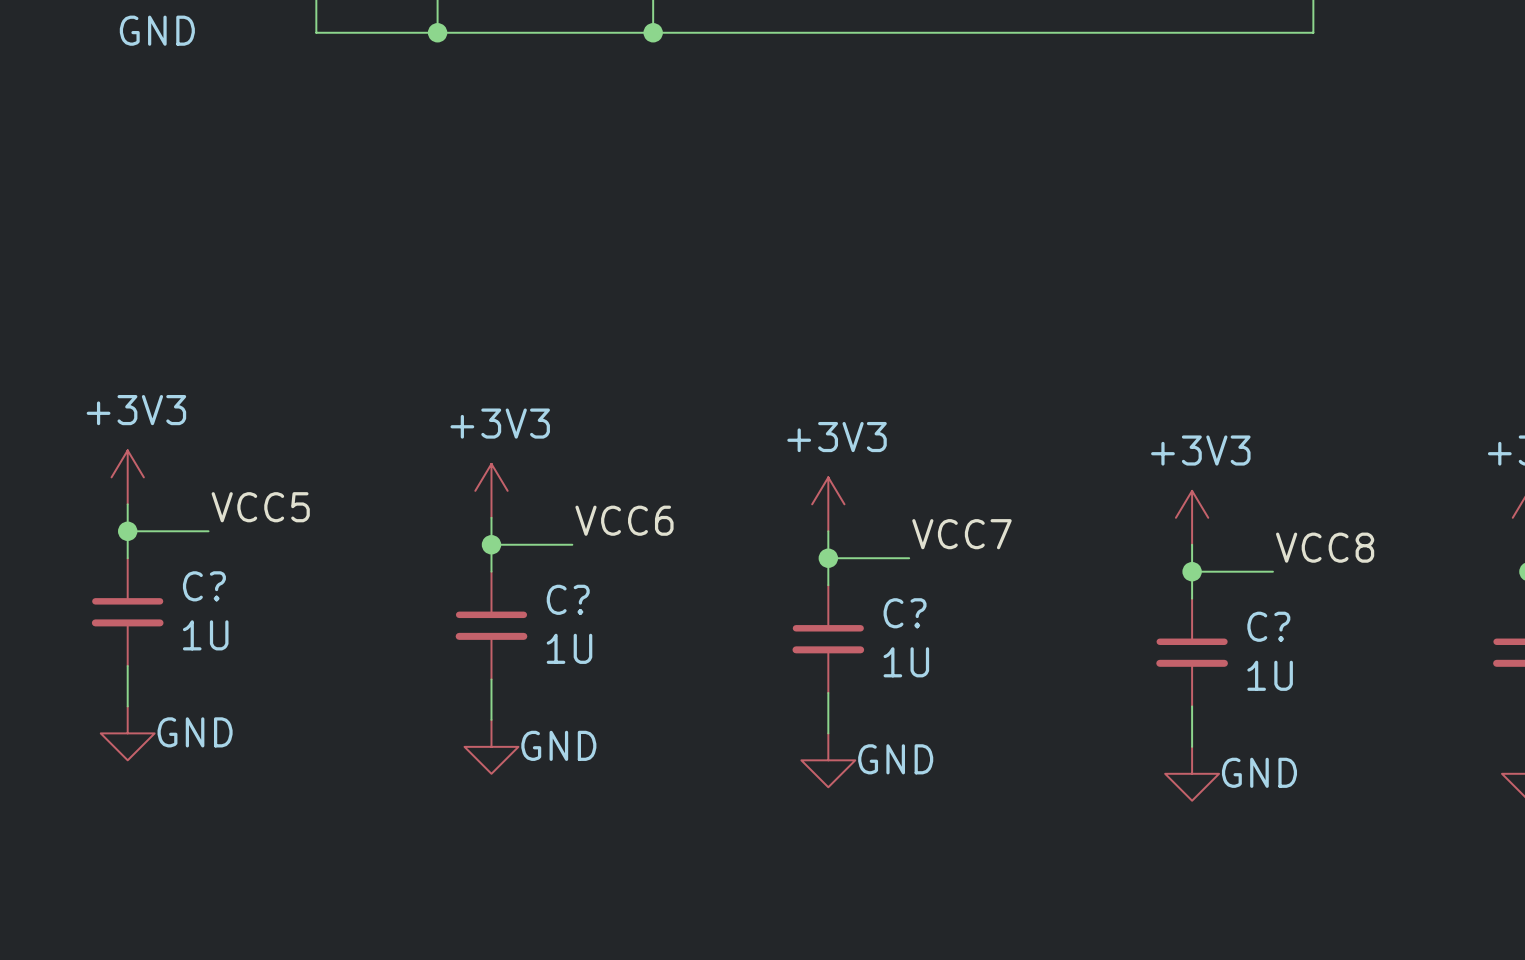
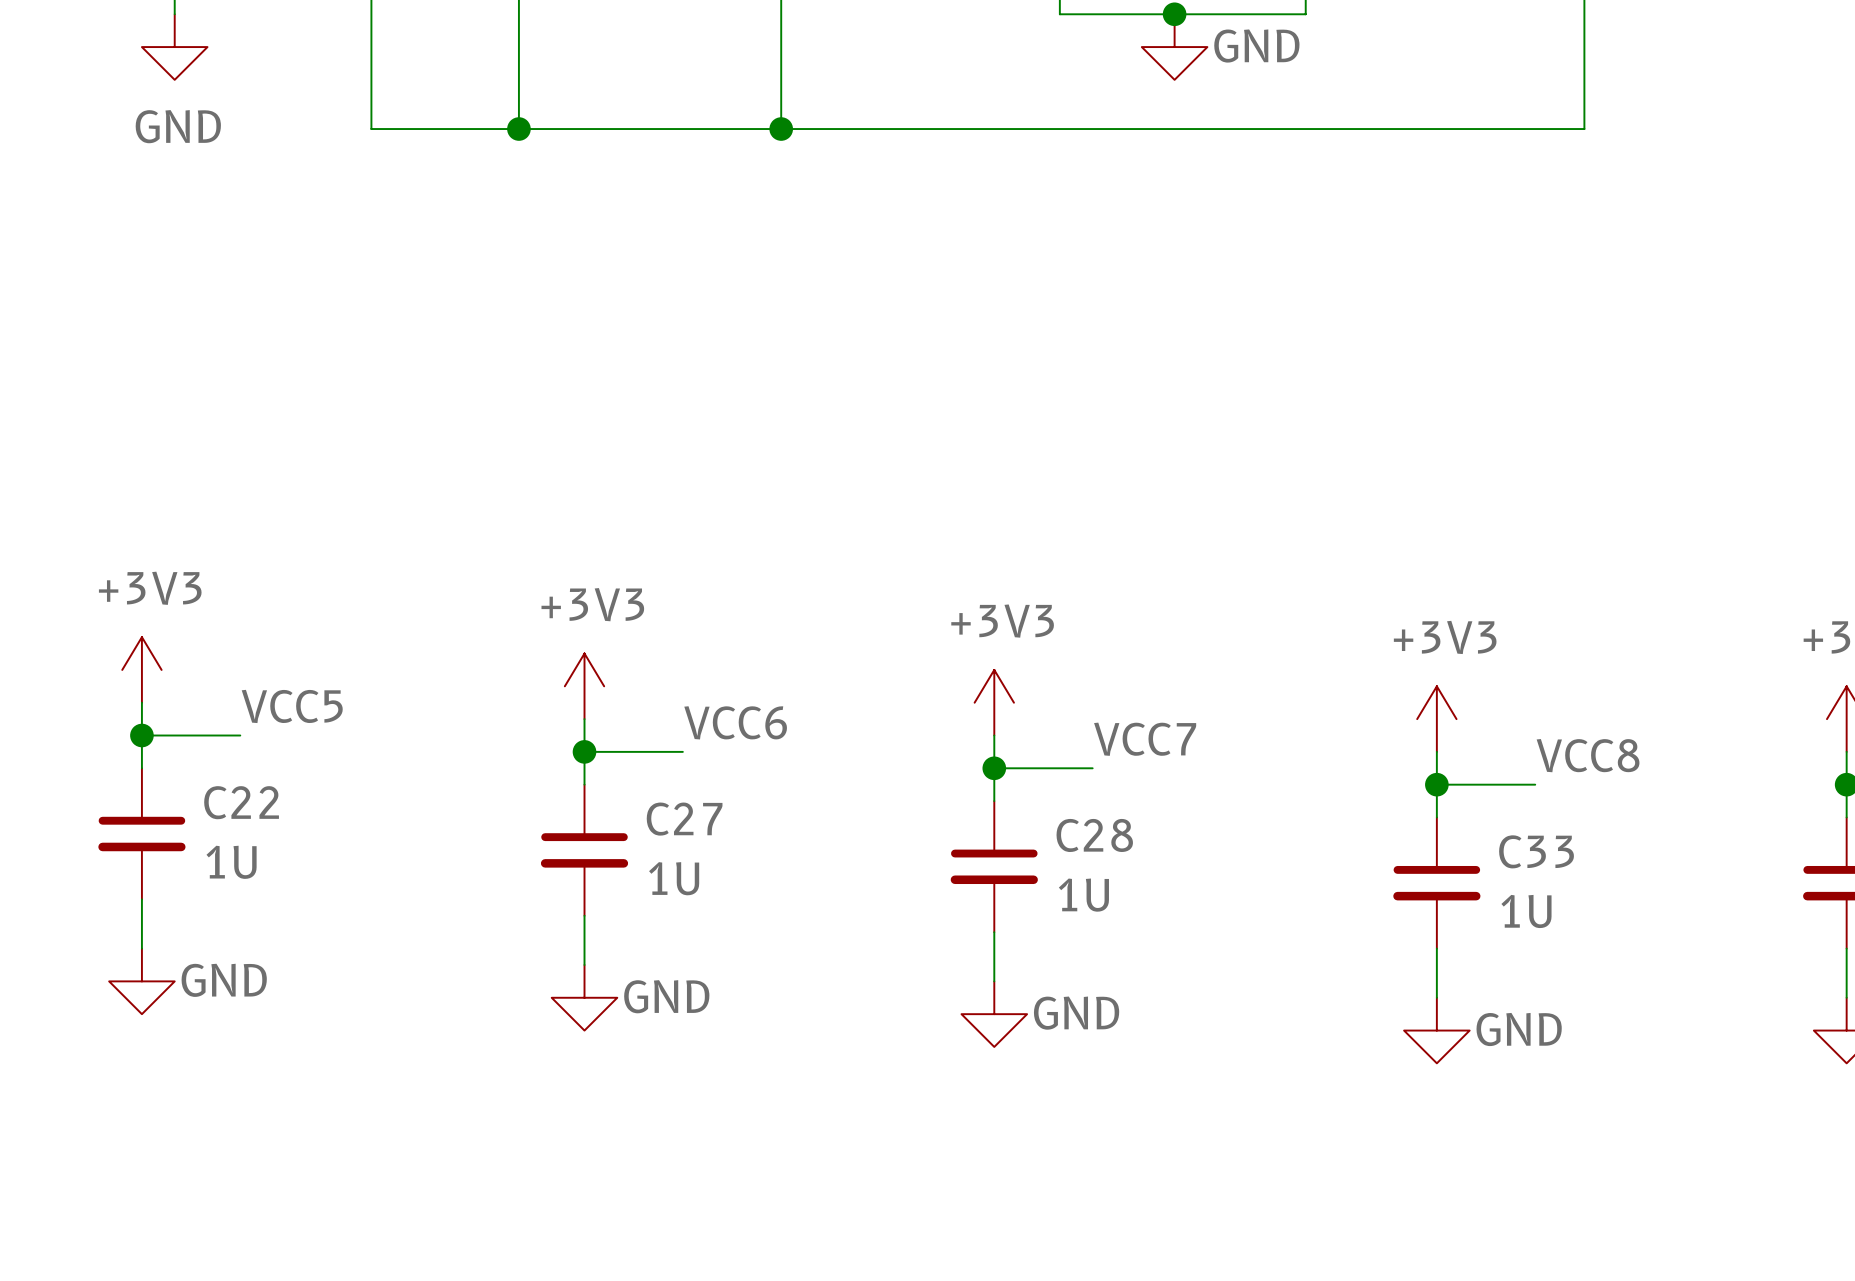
C? name: C? (204, 586) -> C22 (241, 802)
C? name: C? (568, 599) -> C27 (684, 819)
C? name: C? (905, 613) -> C28 (1094, 835)
C? name: C? (1268, 626) -> C33 (1536, 851)

